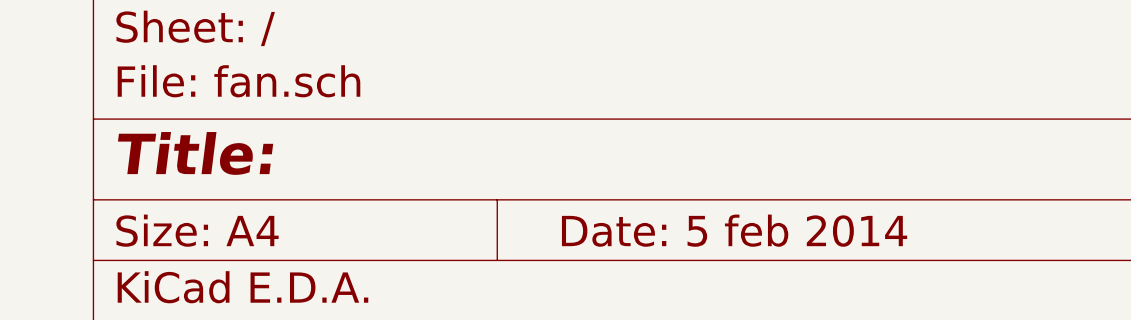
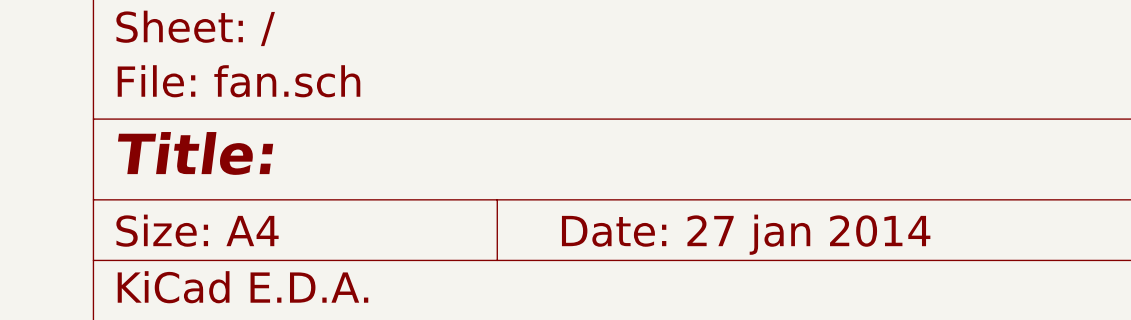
title block: Date: 5 feb 2014 (734, 230) -> Date: 27 jan 2014 (746, 234)

